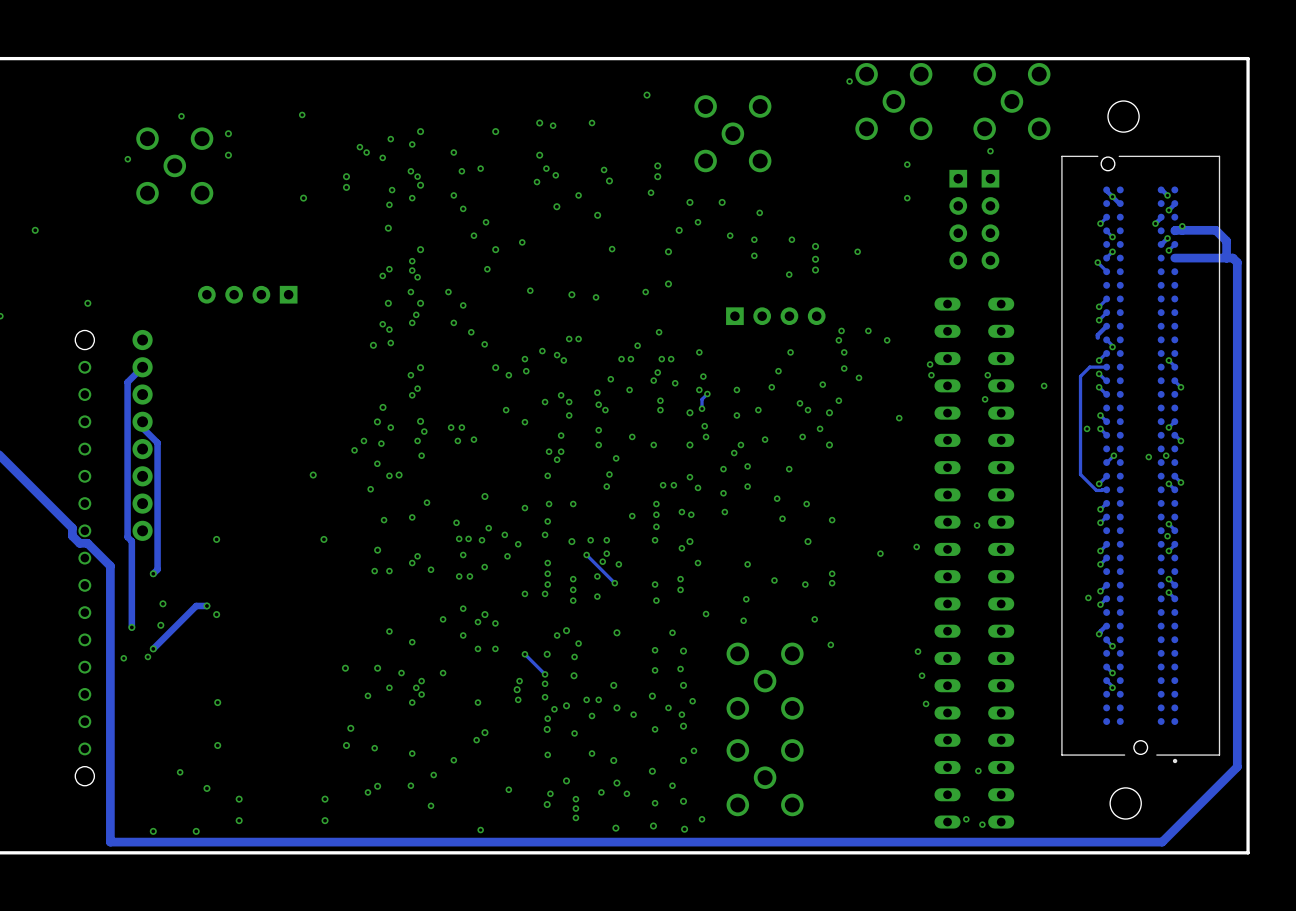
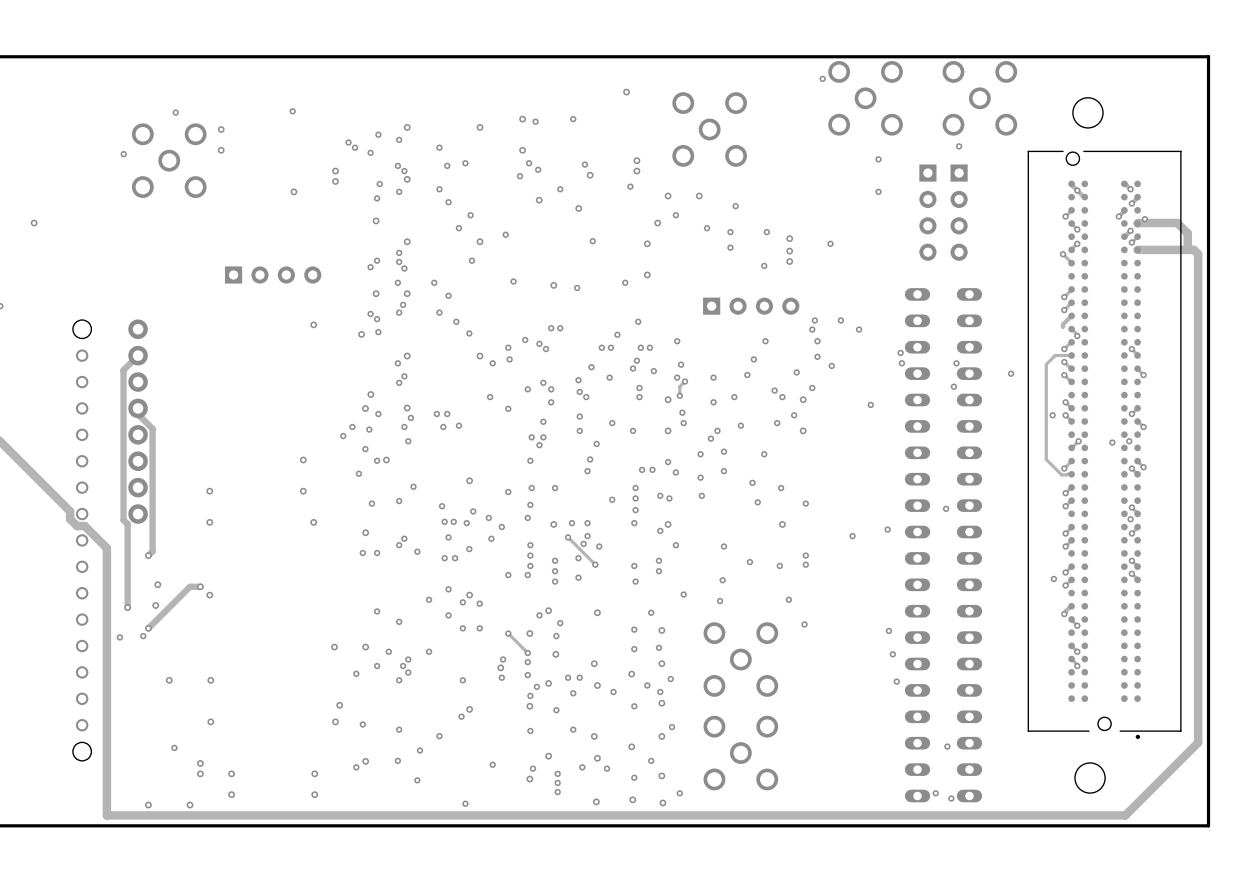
part rotation: 0° (247, 294) -> 180° (273, 274)
via: (87, 303) -> none
via: none -> (313, 324)
via: none -> (209, 491)
via: none -> (303, 491)
via: none -> (169, 680)
via: none -> (200, 773)

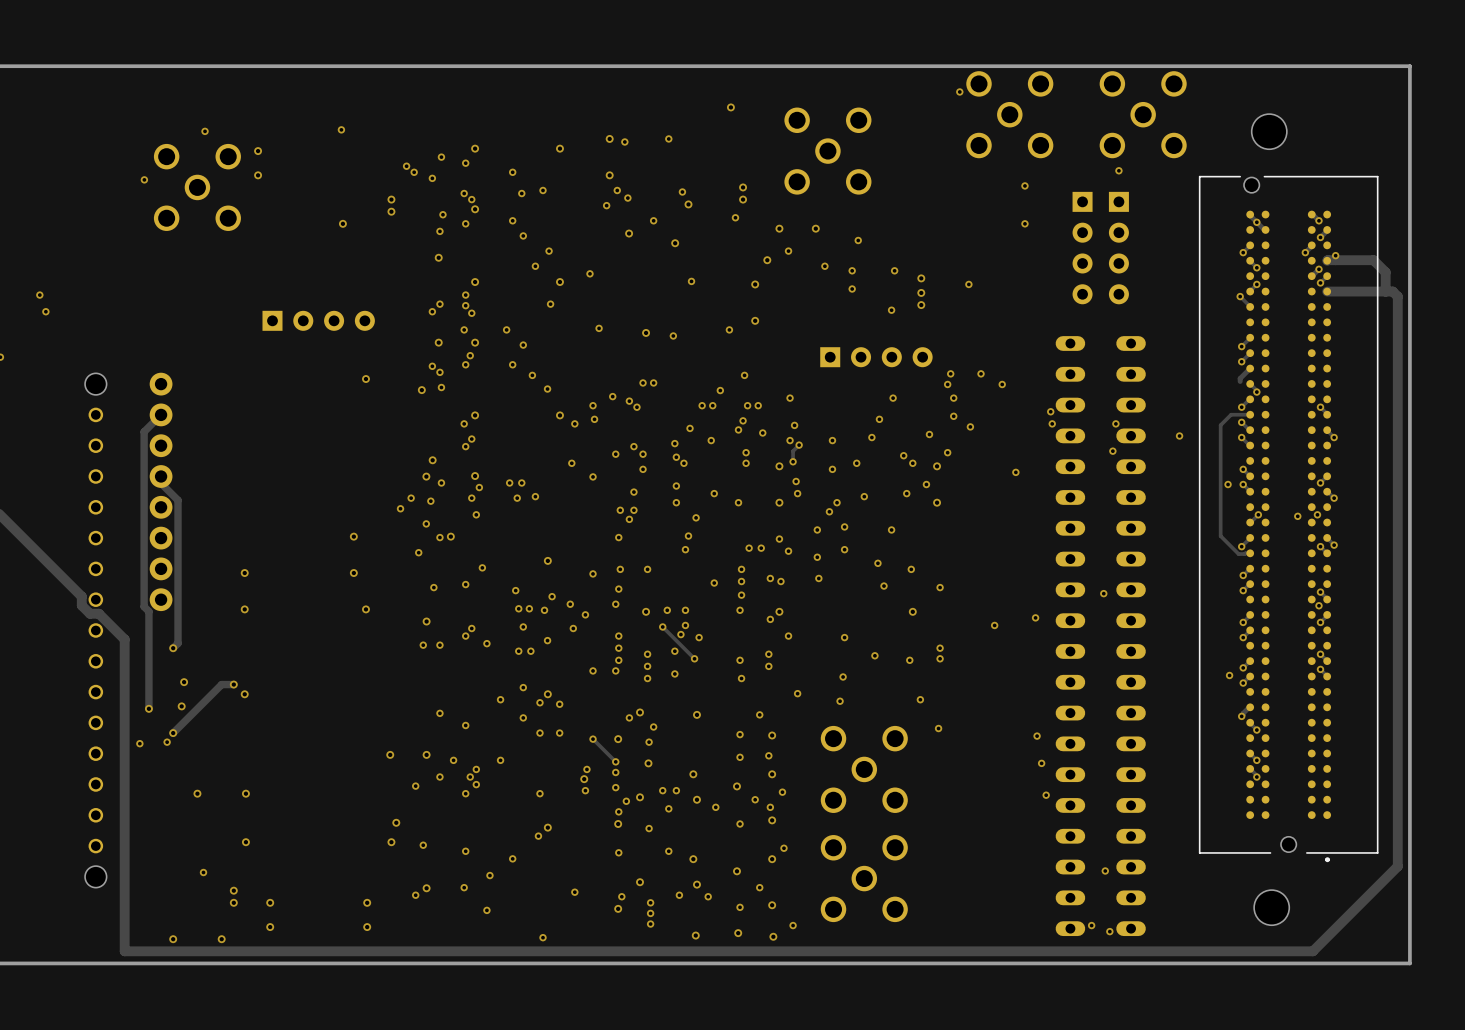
via: (34, 223) -> none
via: none -> (39, 295)
via: none -> (45, 311)

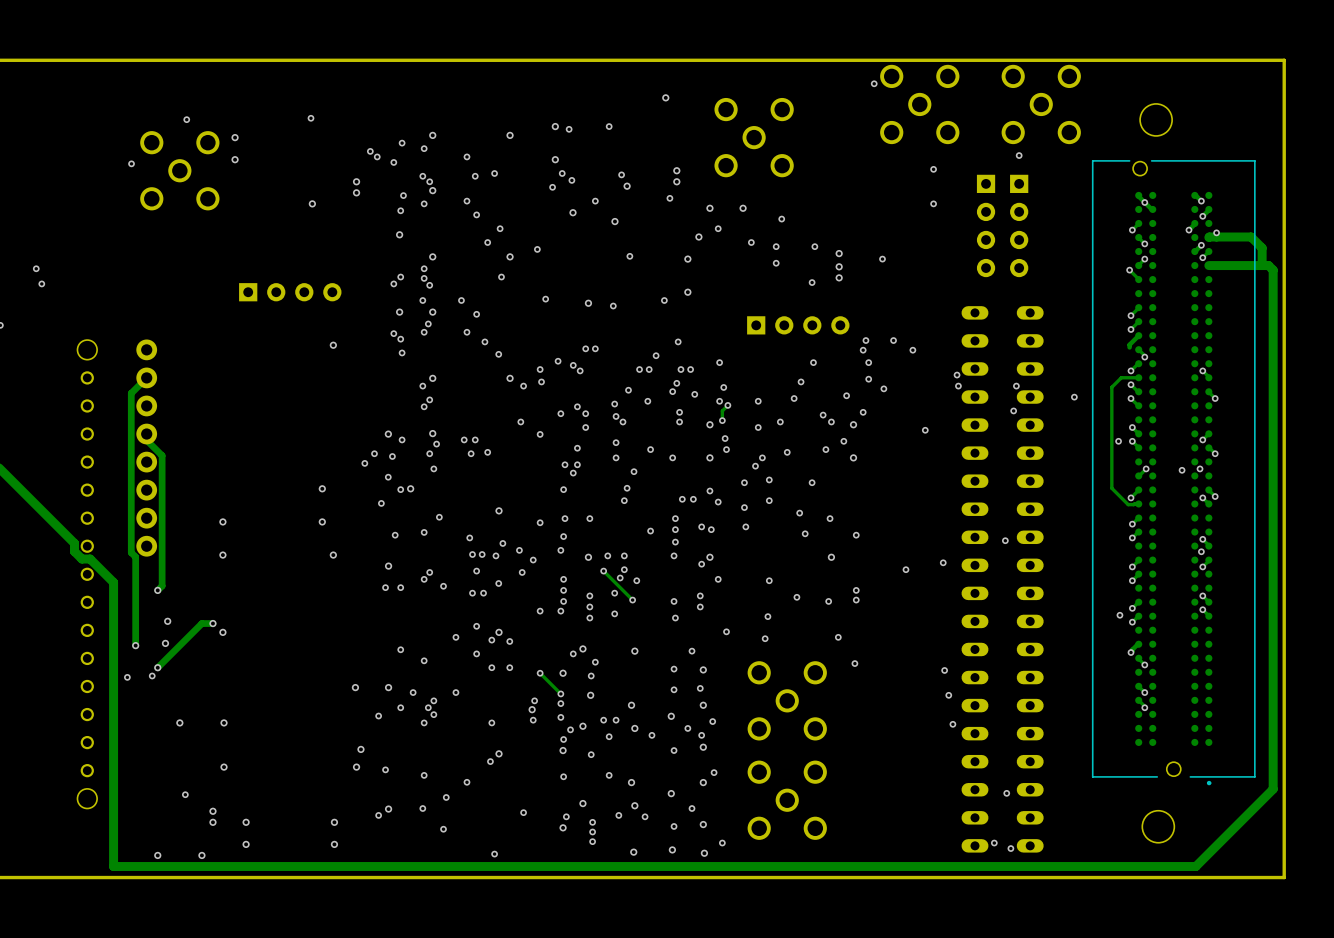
via: (421, 390) -> none
via: (432, 460) -> none

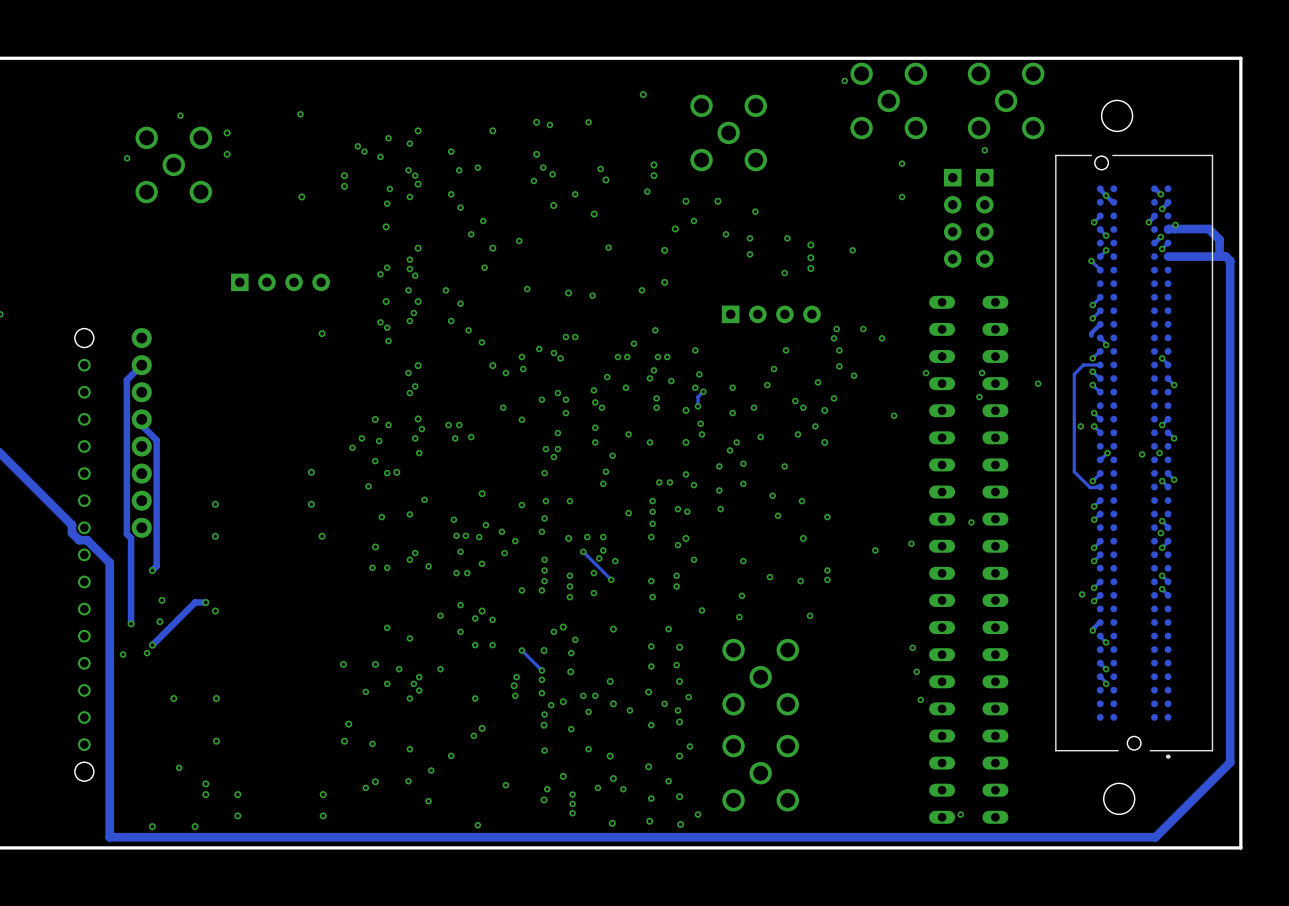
via: (36, 268) -> none
via: (41, 283) -> none
via: (957, 375) -> none
via: (854, 663) -> none
via: (1006, 793) -> none
via: (1010, 848) -> none

